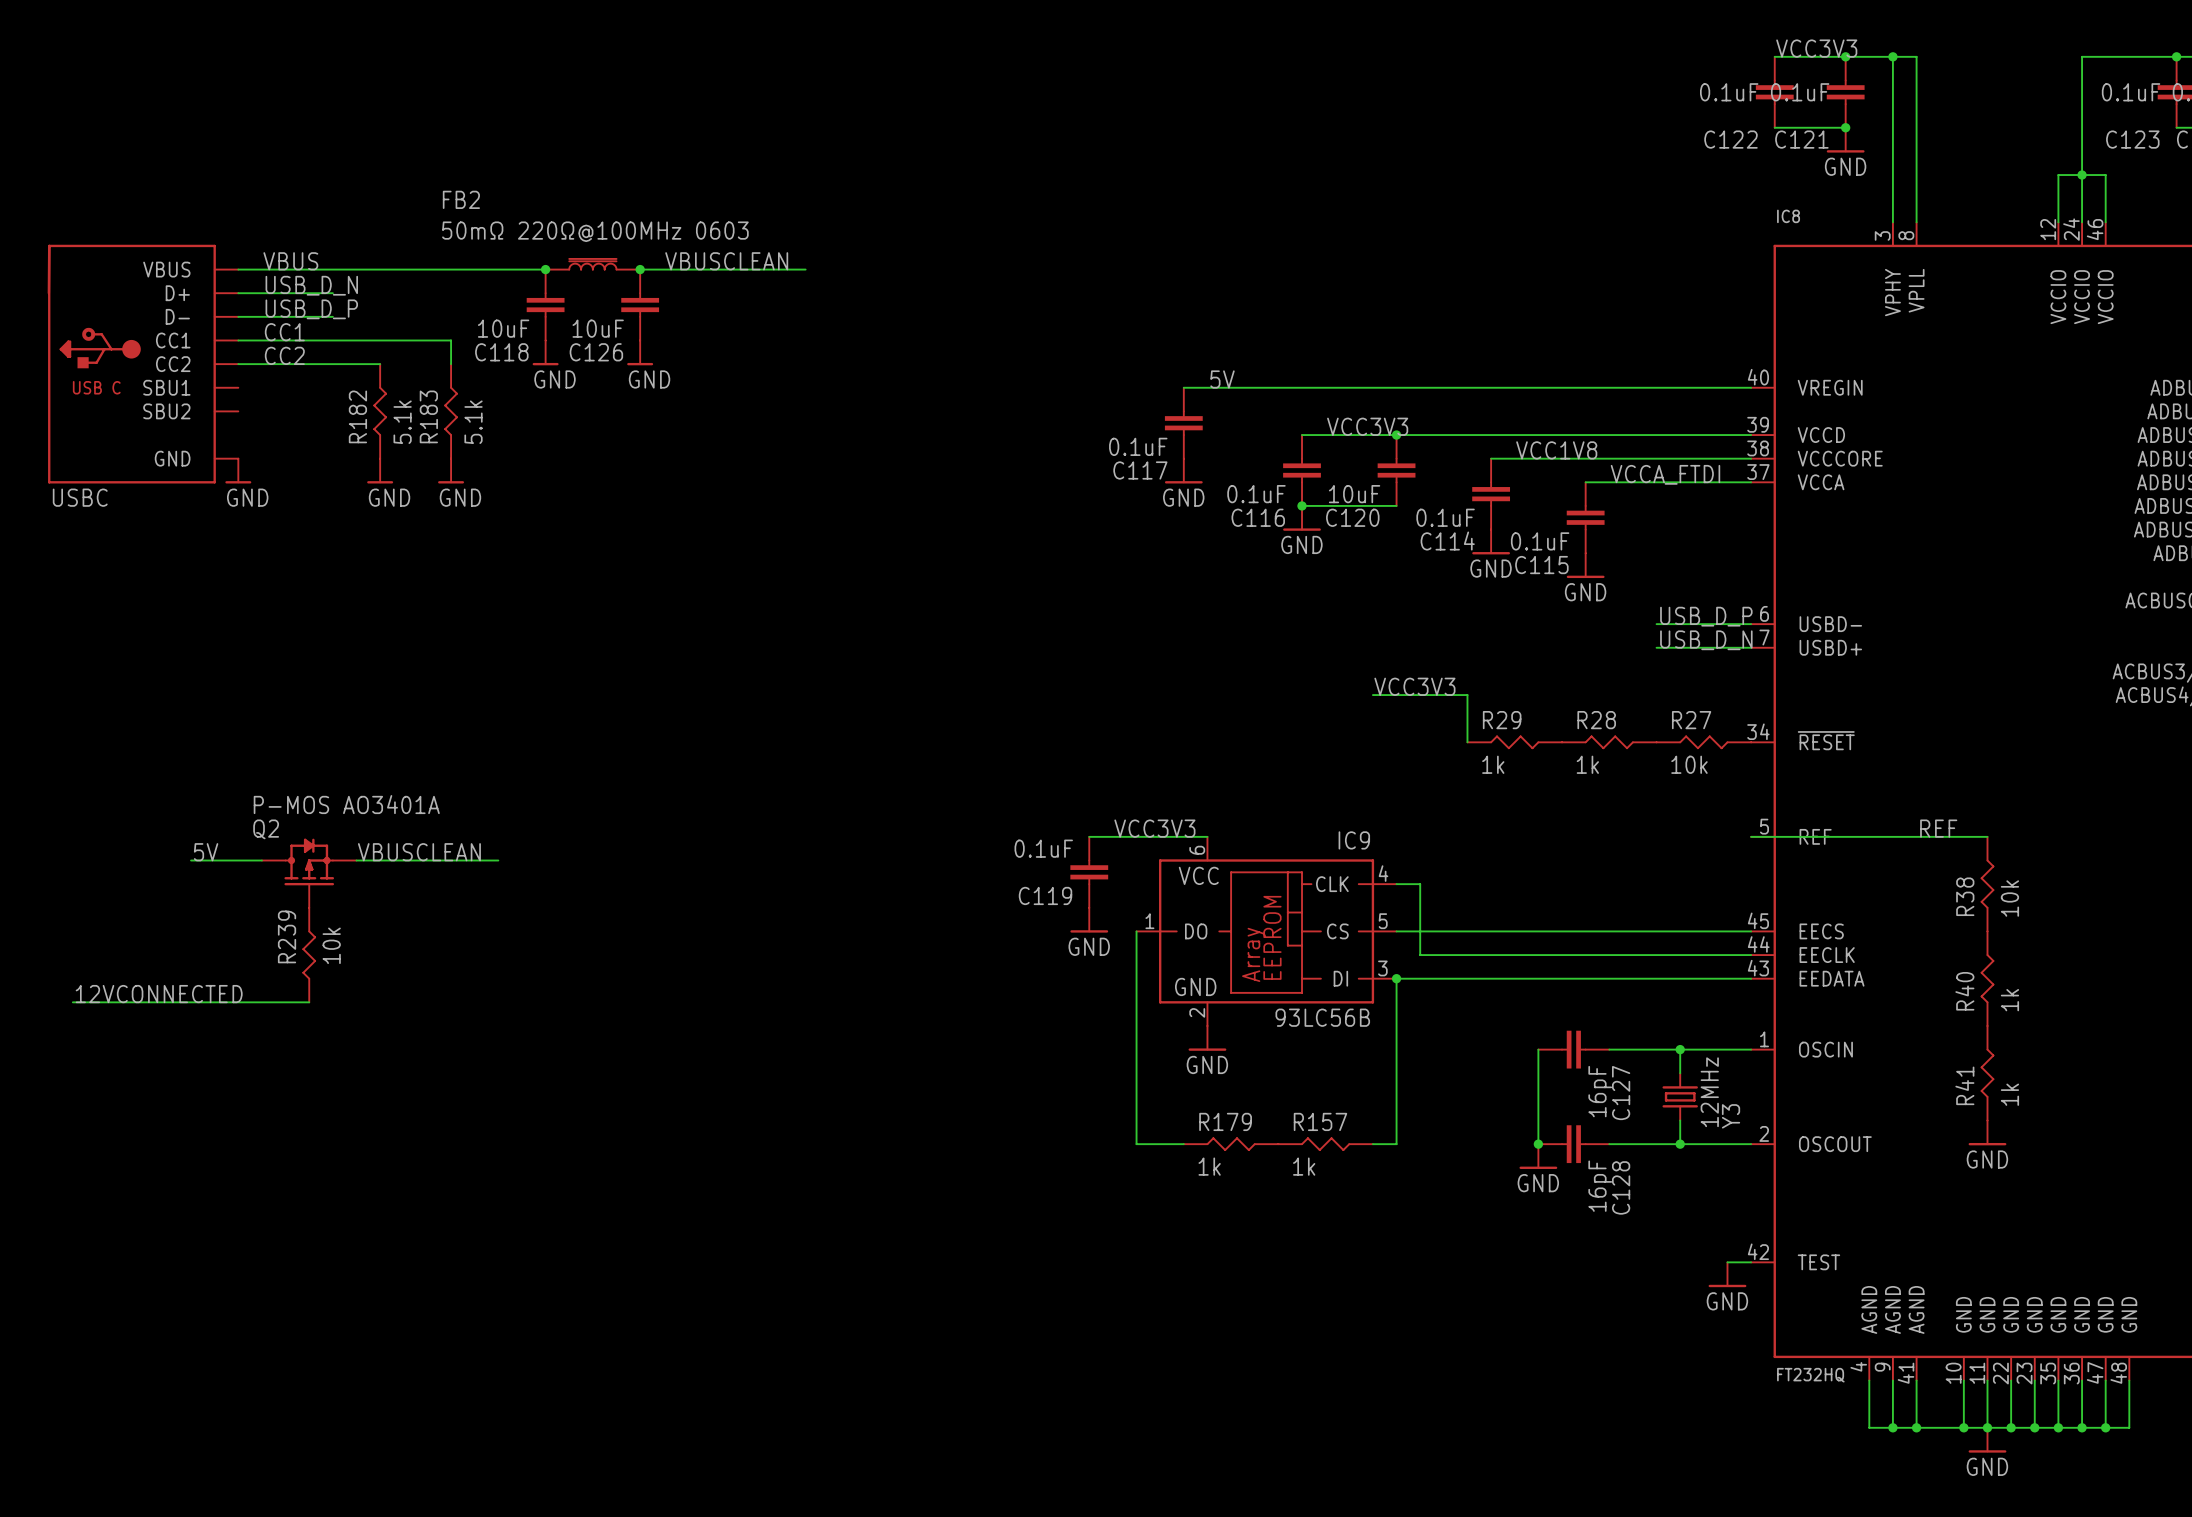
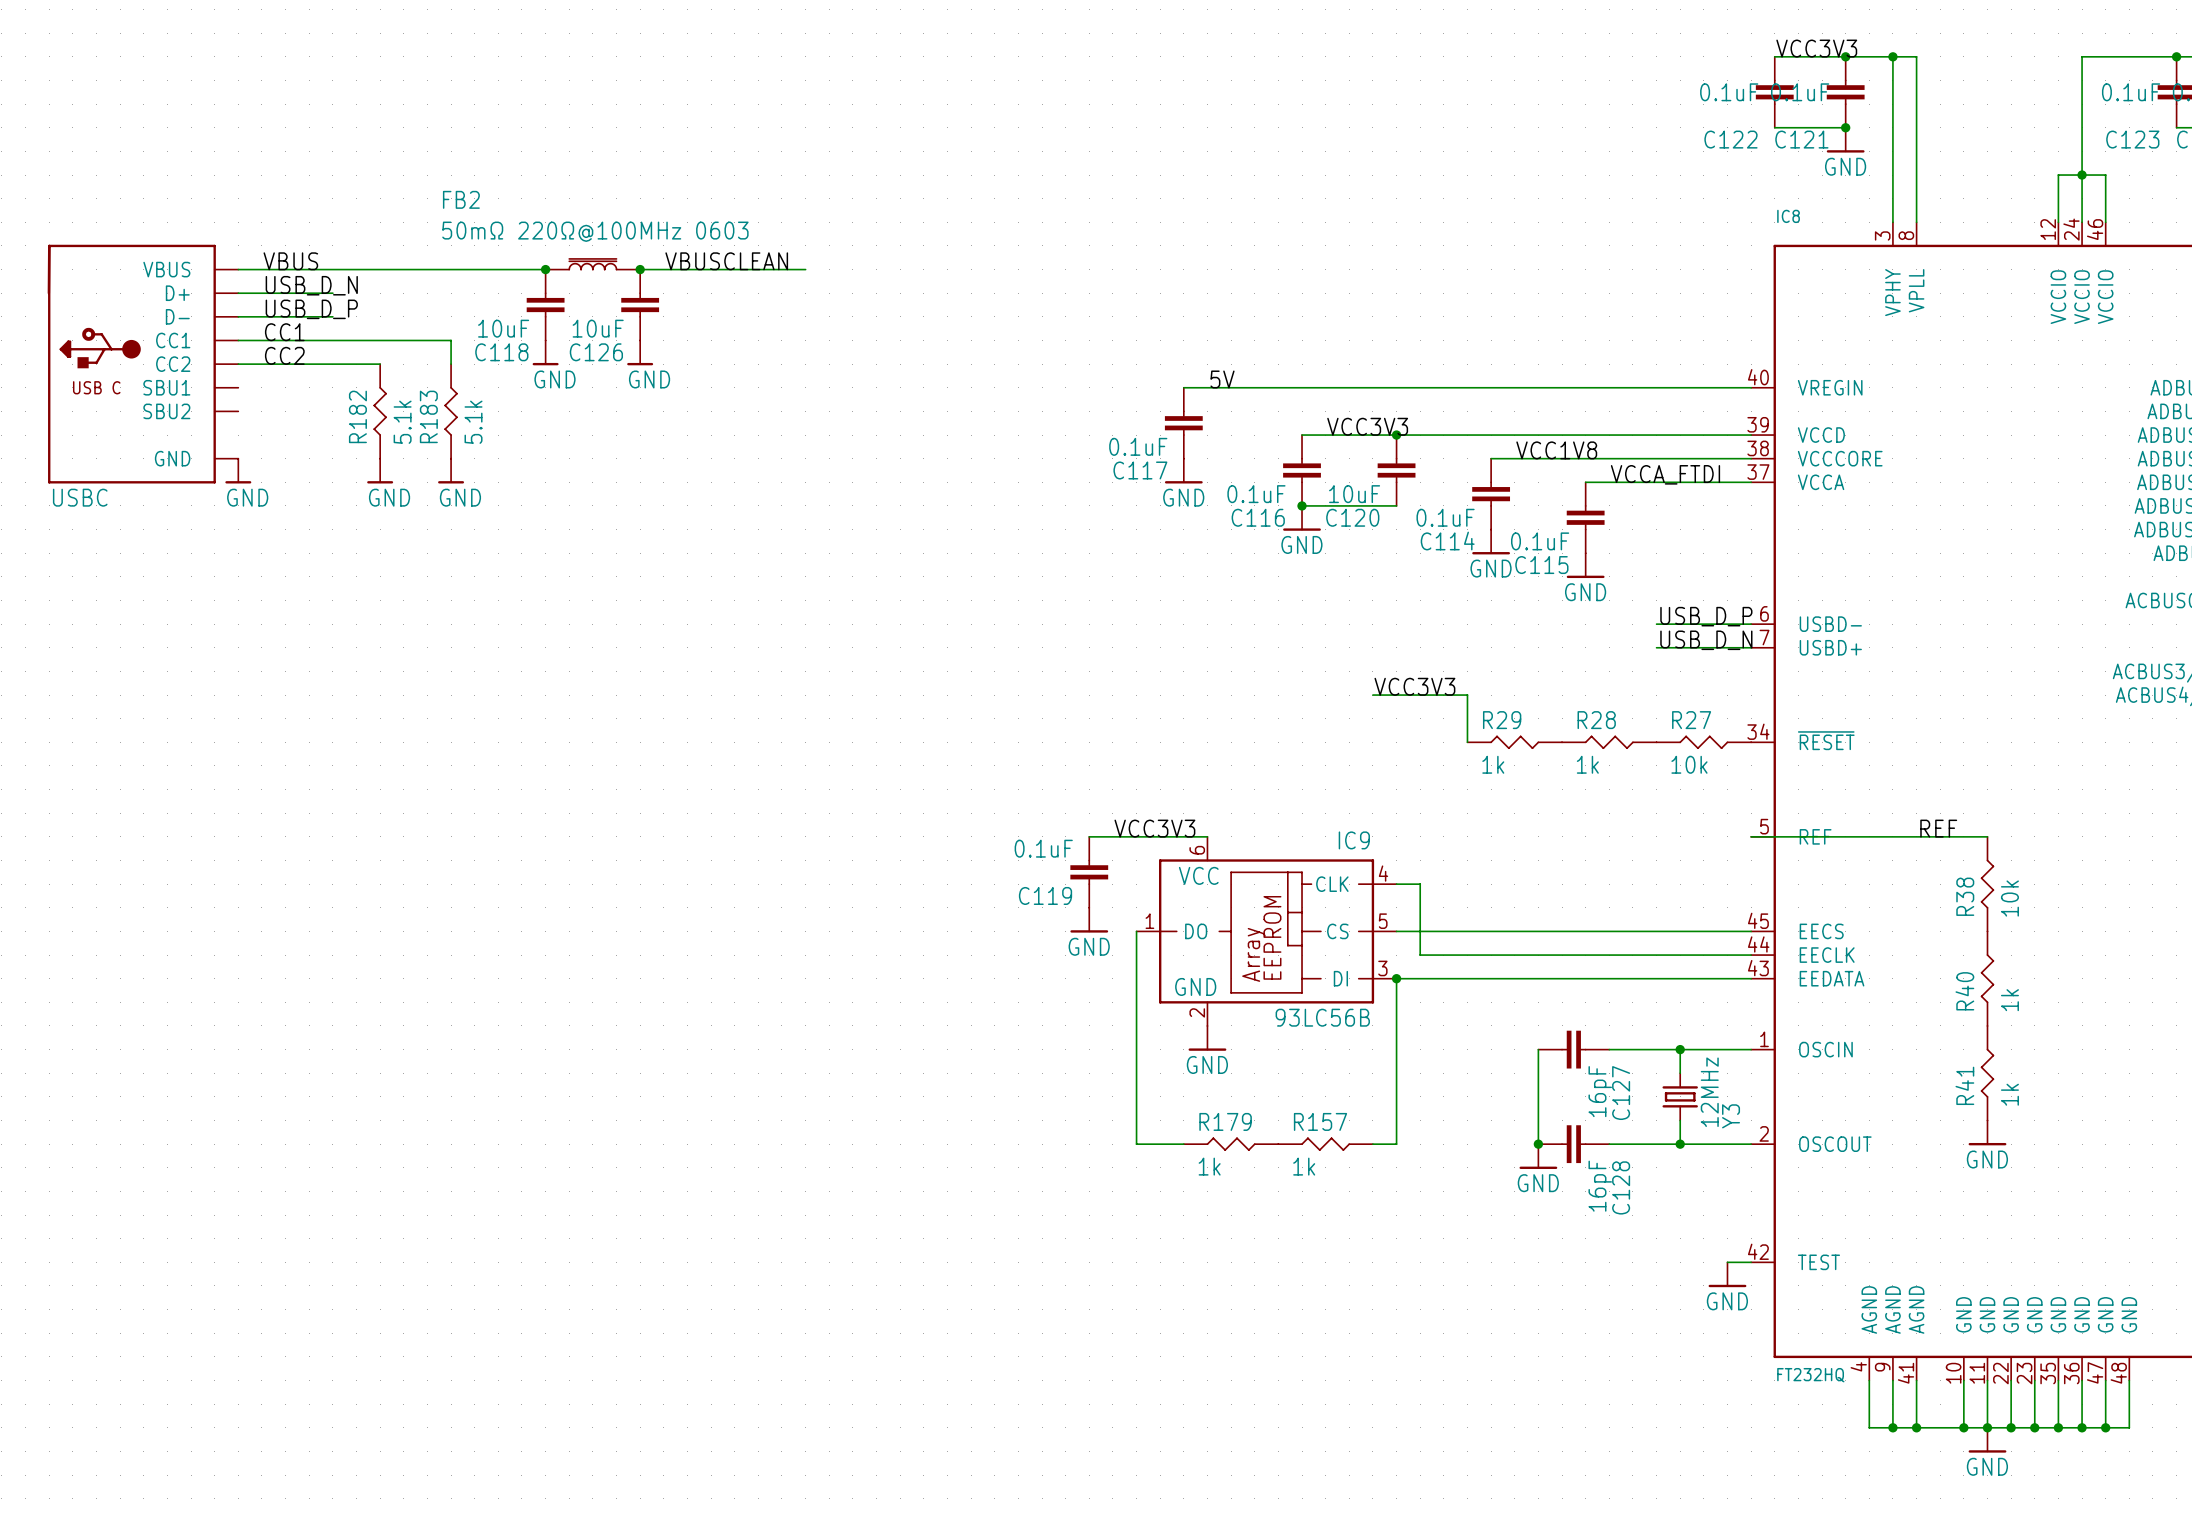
label: 5V (206, 852) -> none
label: VBUSCLEAN (419, 852) -> none
wire: (191, 860) (261, 860) -> none
wire: (356, 860) (498, 860) -> none
Q2: (309, 873) -> none
R239: 10k (309, 955) -> none
label: 12VCONNECTED (159, 994) -> none
wire: (72, 1002) (309, 1002) -> none

